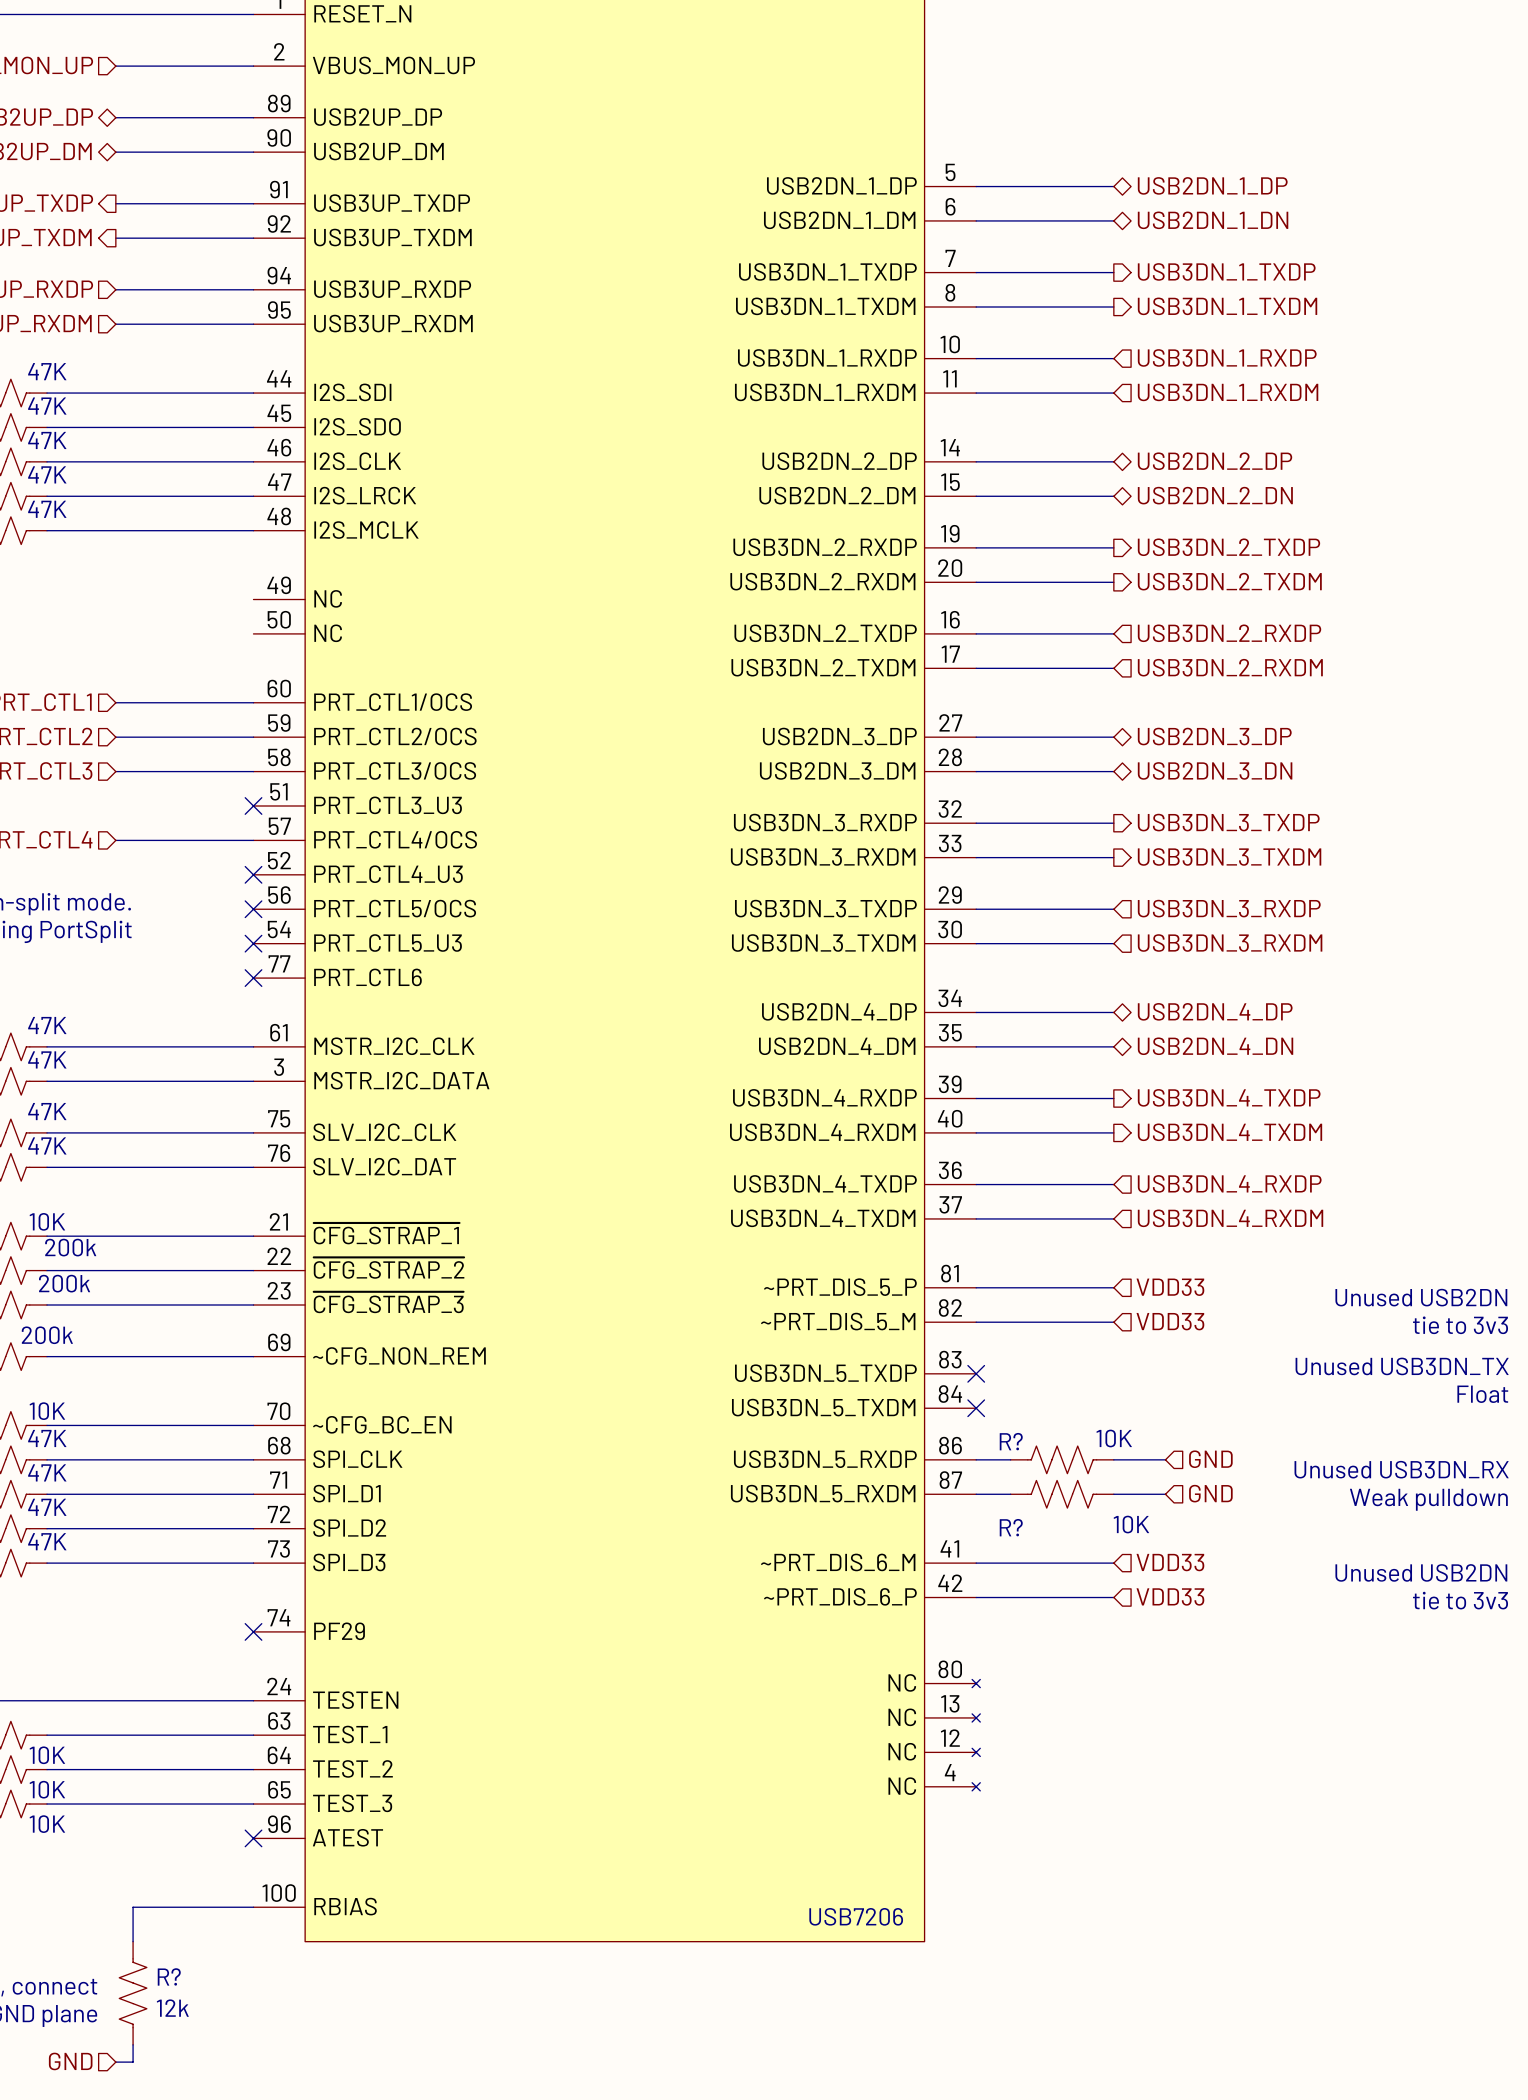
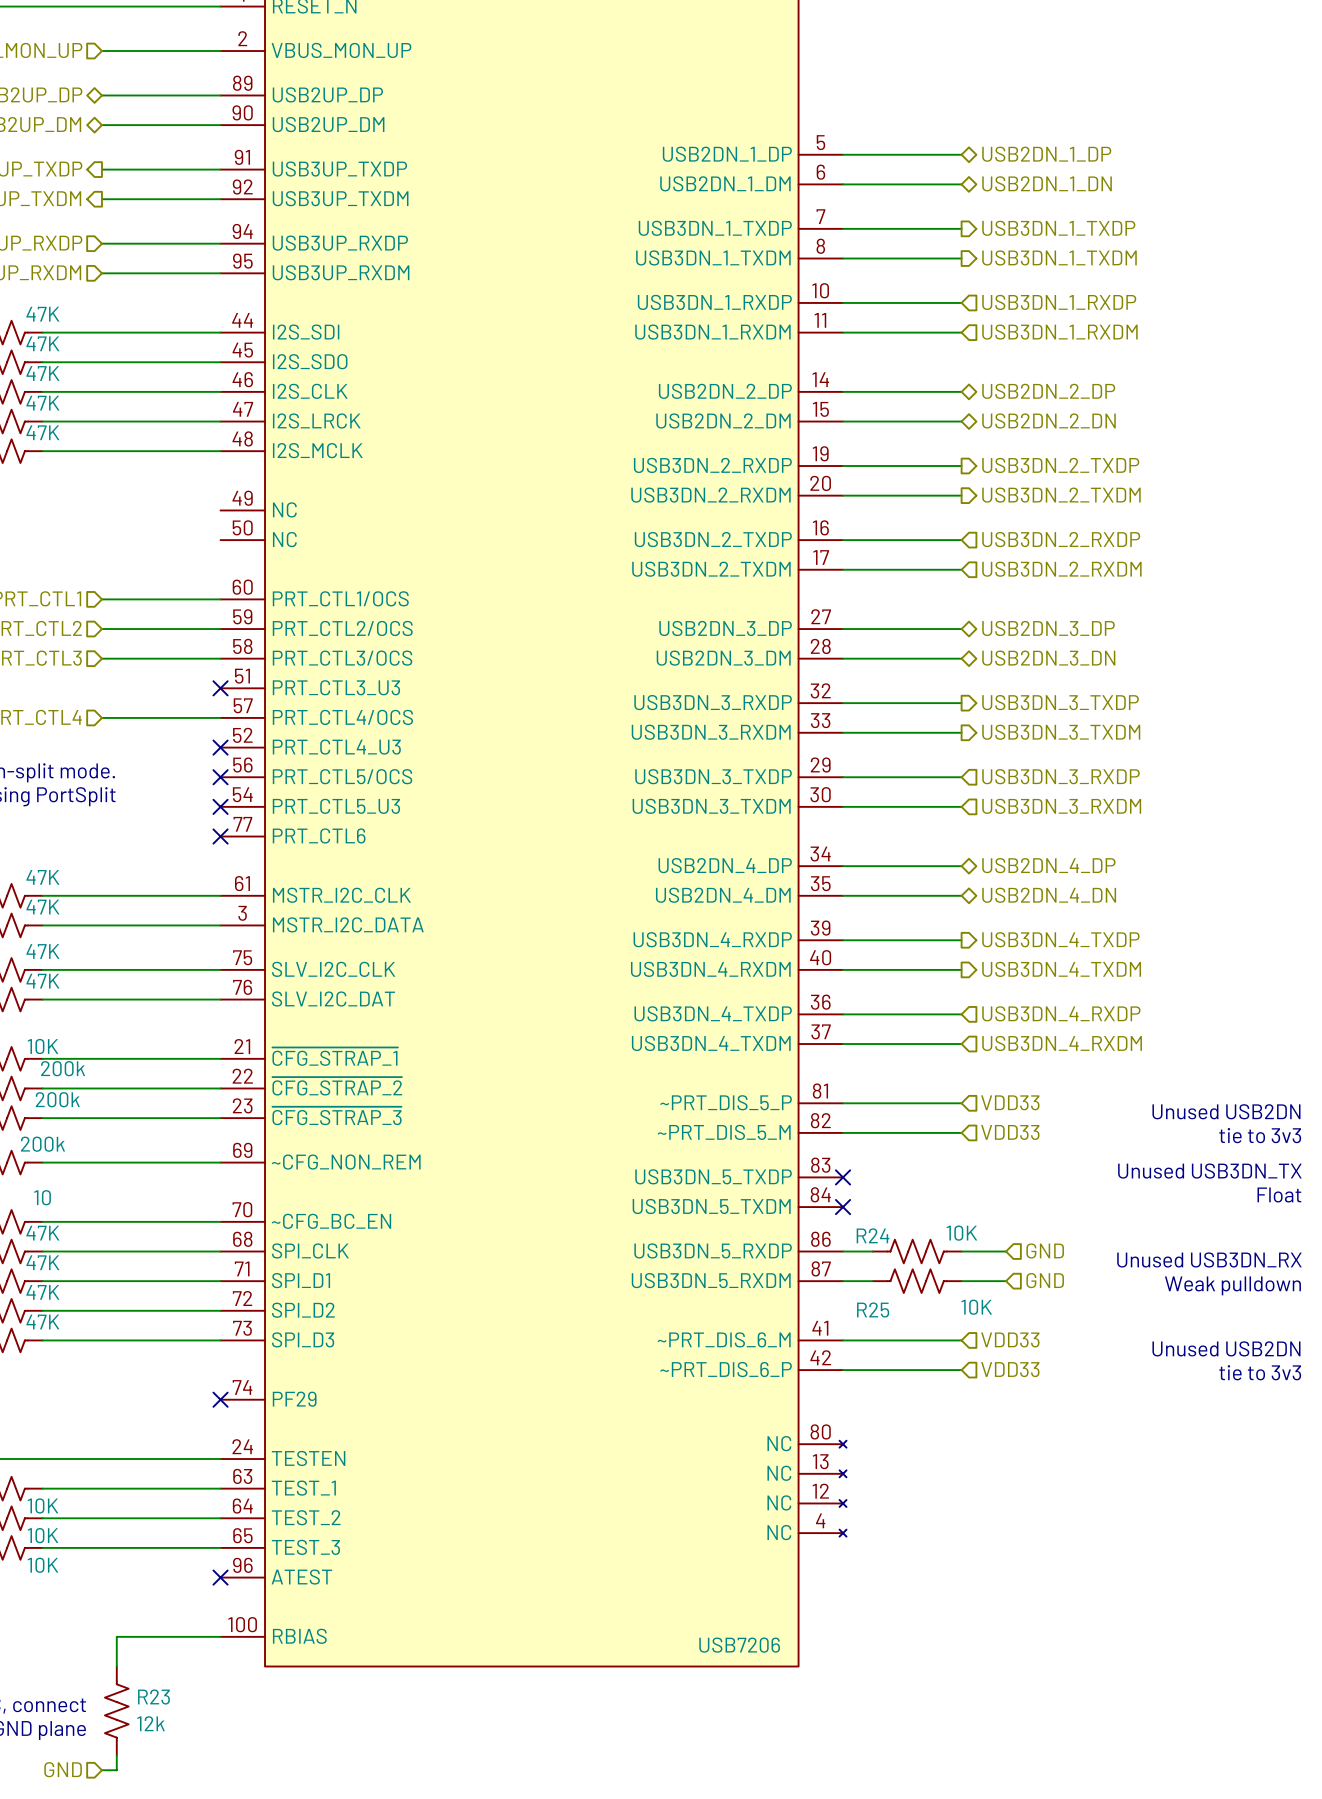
part text: 10K (47, 1411) -> 10 (42, 1197)
R? name: R? (1011, 1441) -> R24 (873, 1235)
R? name: R? (1011, 1527) -> R25 (873, 1310)
R? name: R? (169, 1976) -> R23 (153, 1697)

